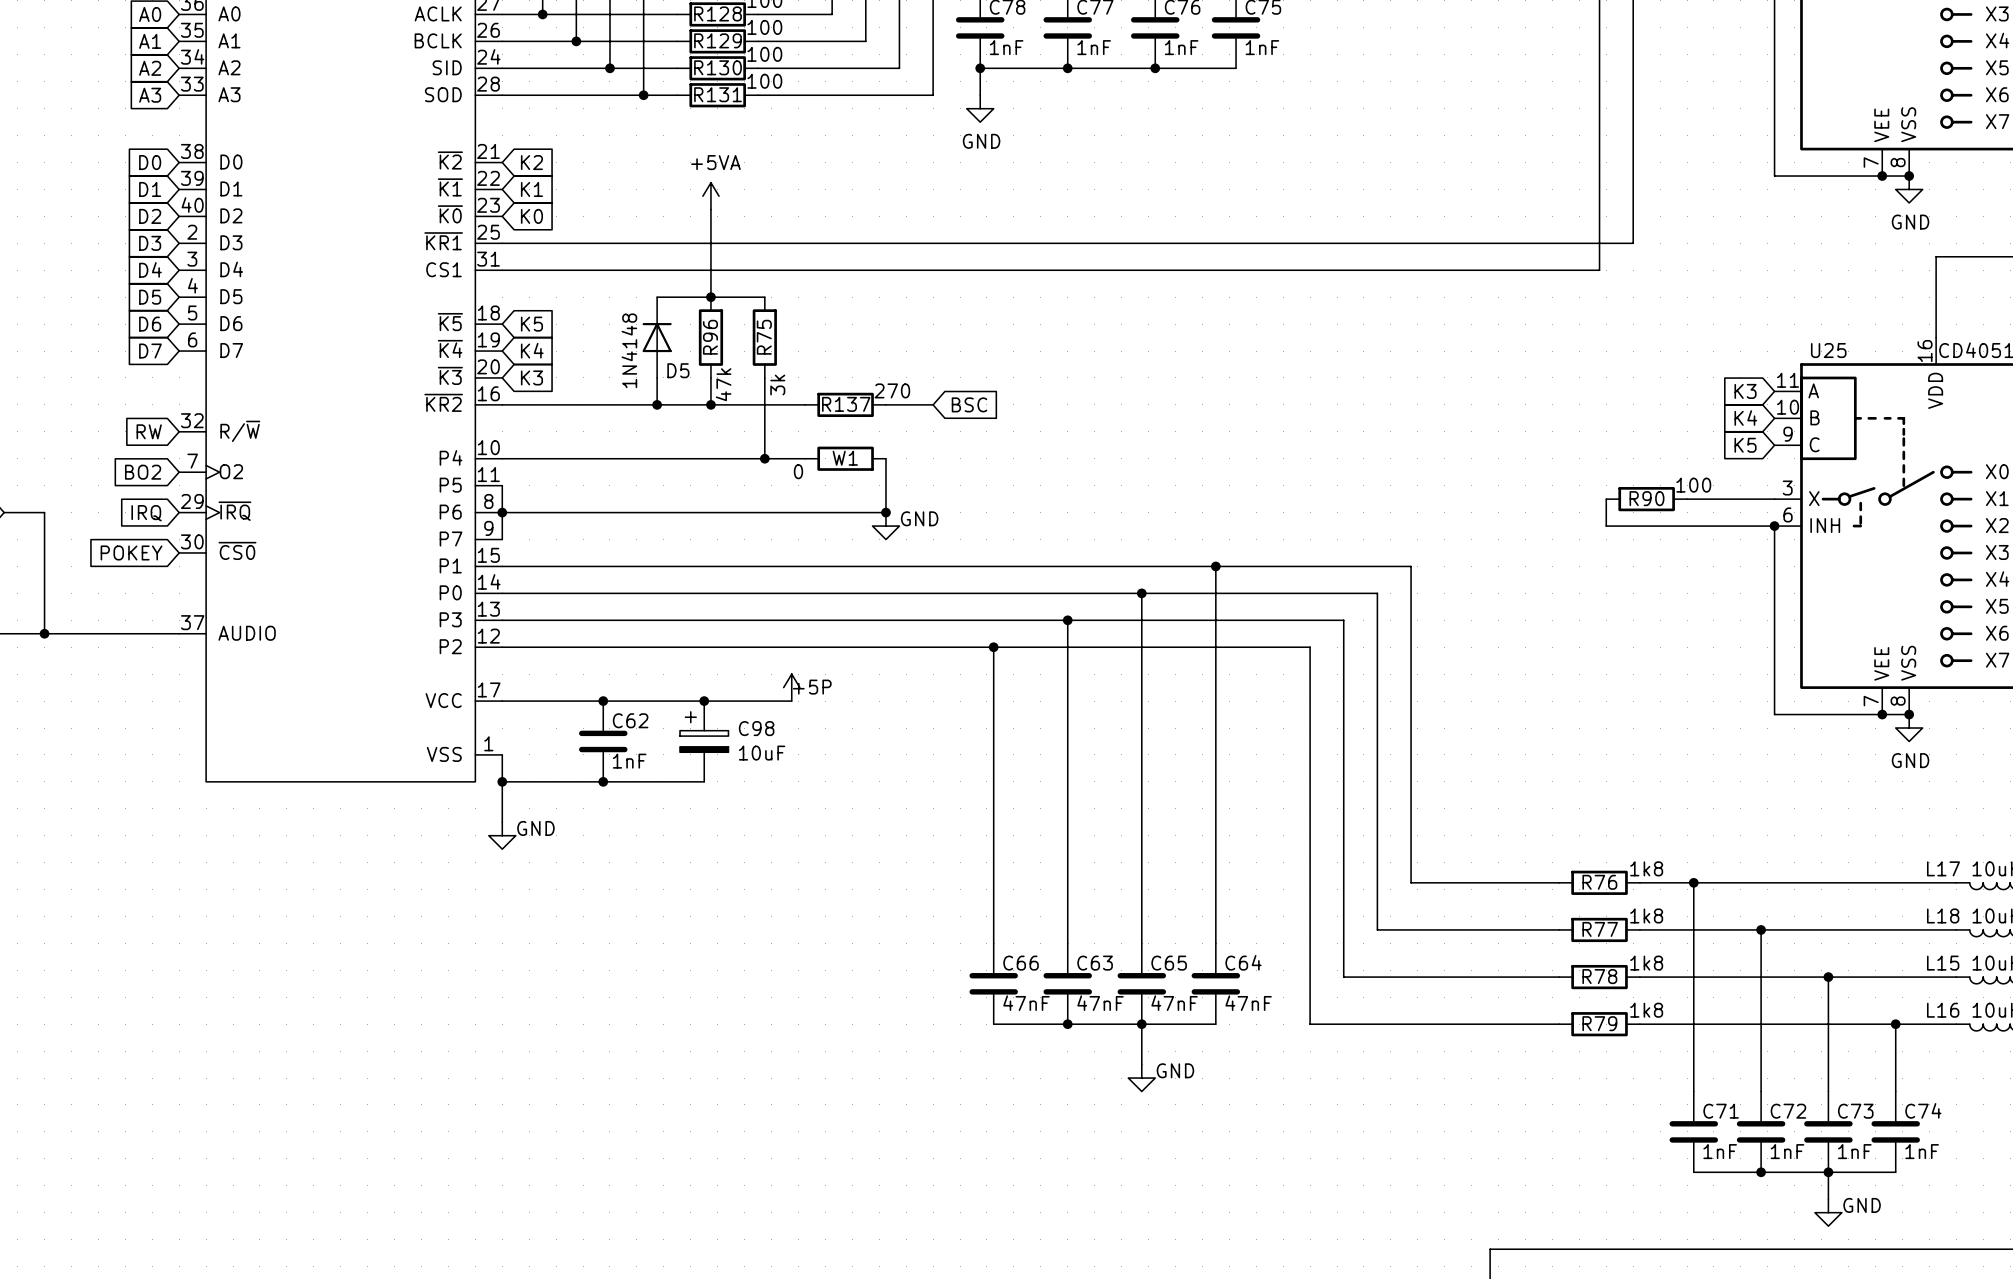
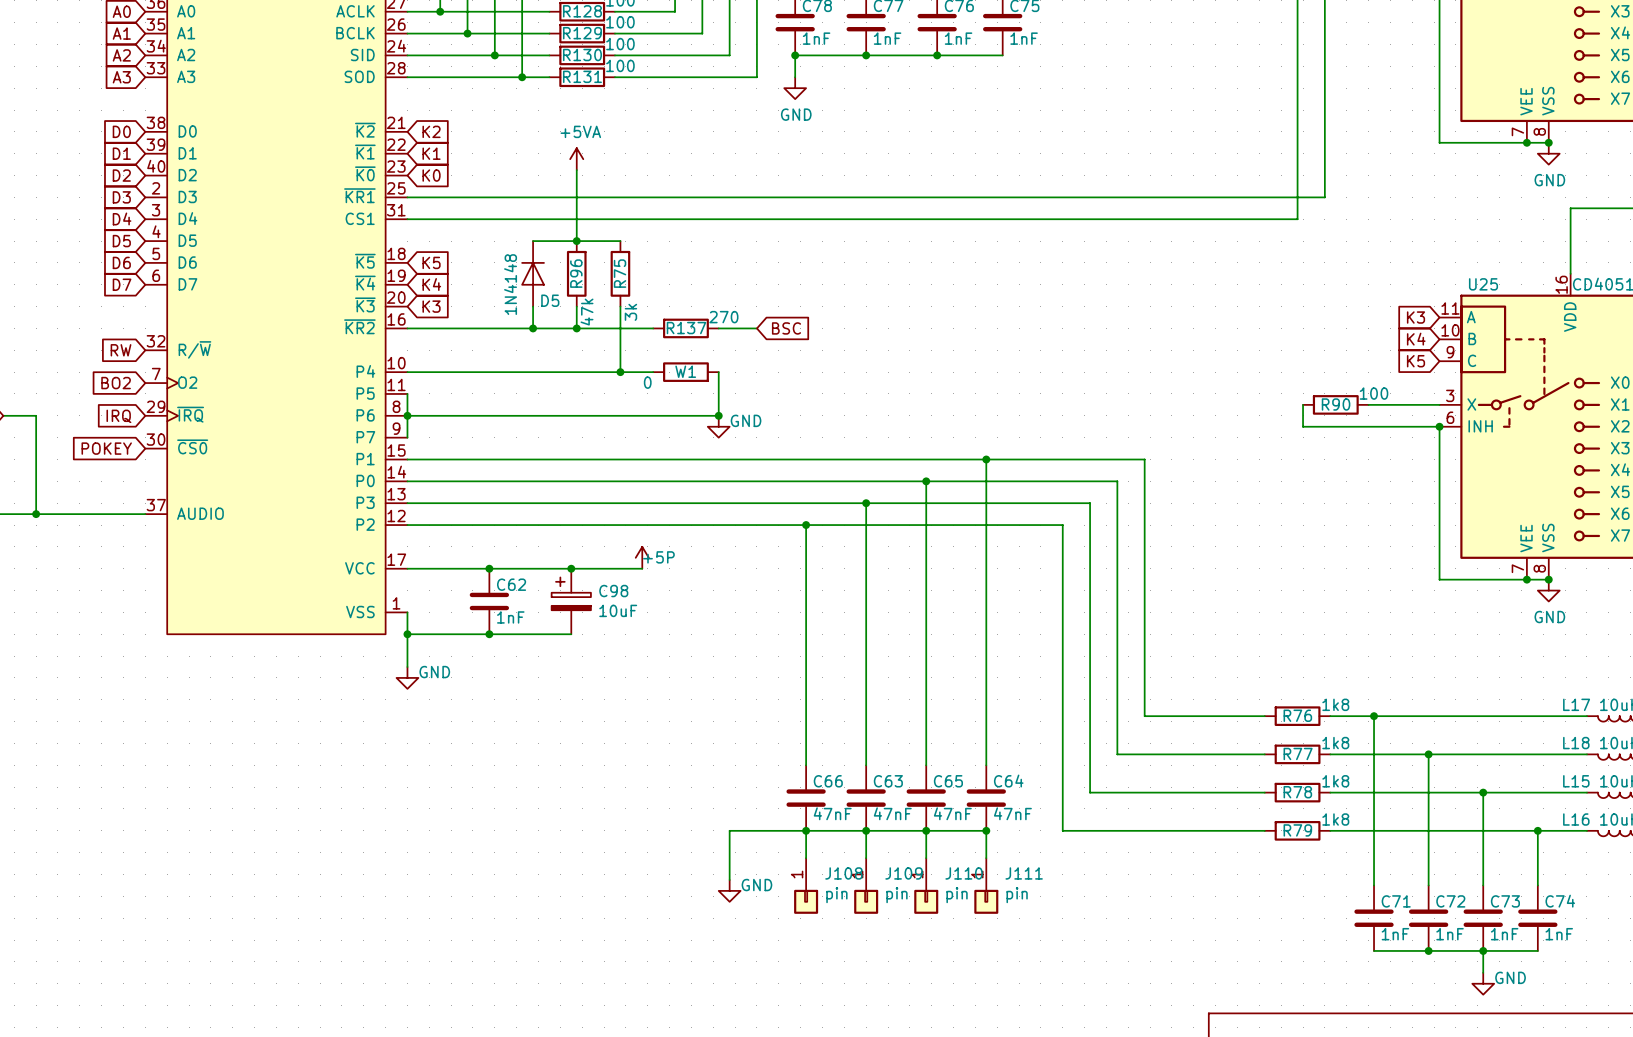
junction: none -> (806, 830)
wire: none -> (866, 830) (866, 858)
wire: none -> (986, 830) (986, 858)
junction: none -> (986, 830)
wire: none -> (806, 858) (806, 830) (729, 830) (729, 879)
power symbol position: GND (1141, 1078) -> GND (729, 890)
J108: none -> pin (806, 885)
J109: none -> pin (866, 885)
J110: none -> pin (926, 885)
J111: none -> pin (986, 885)

